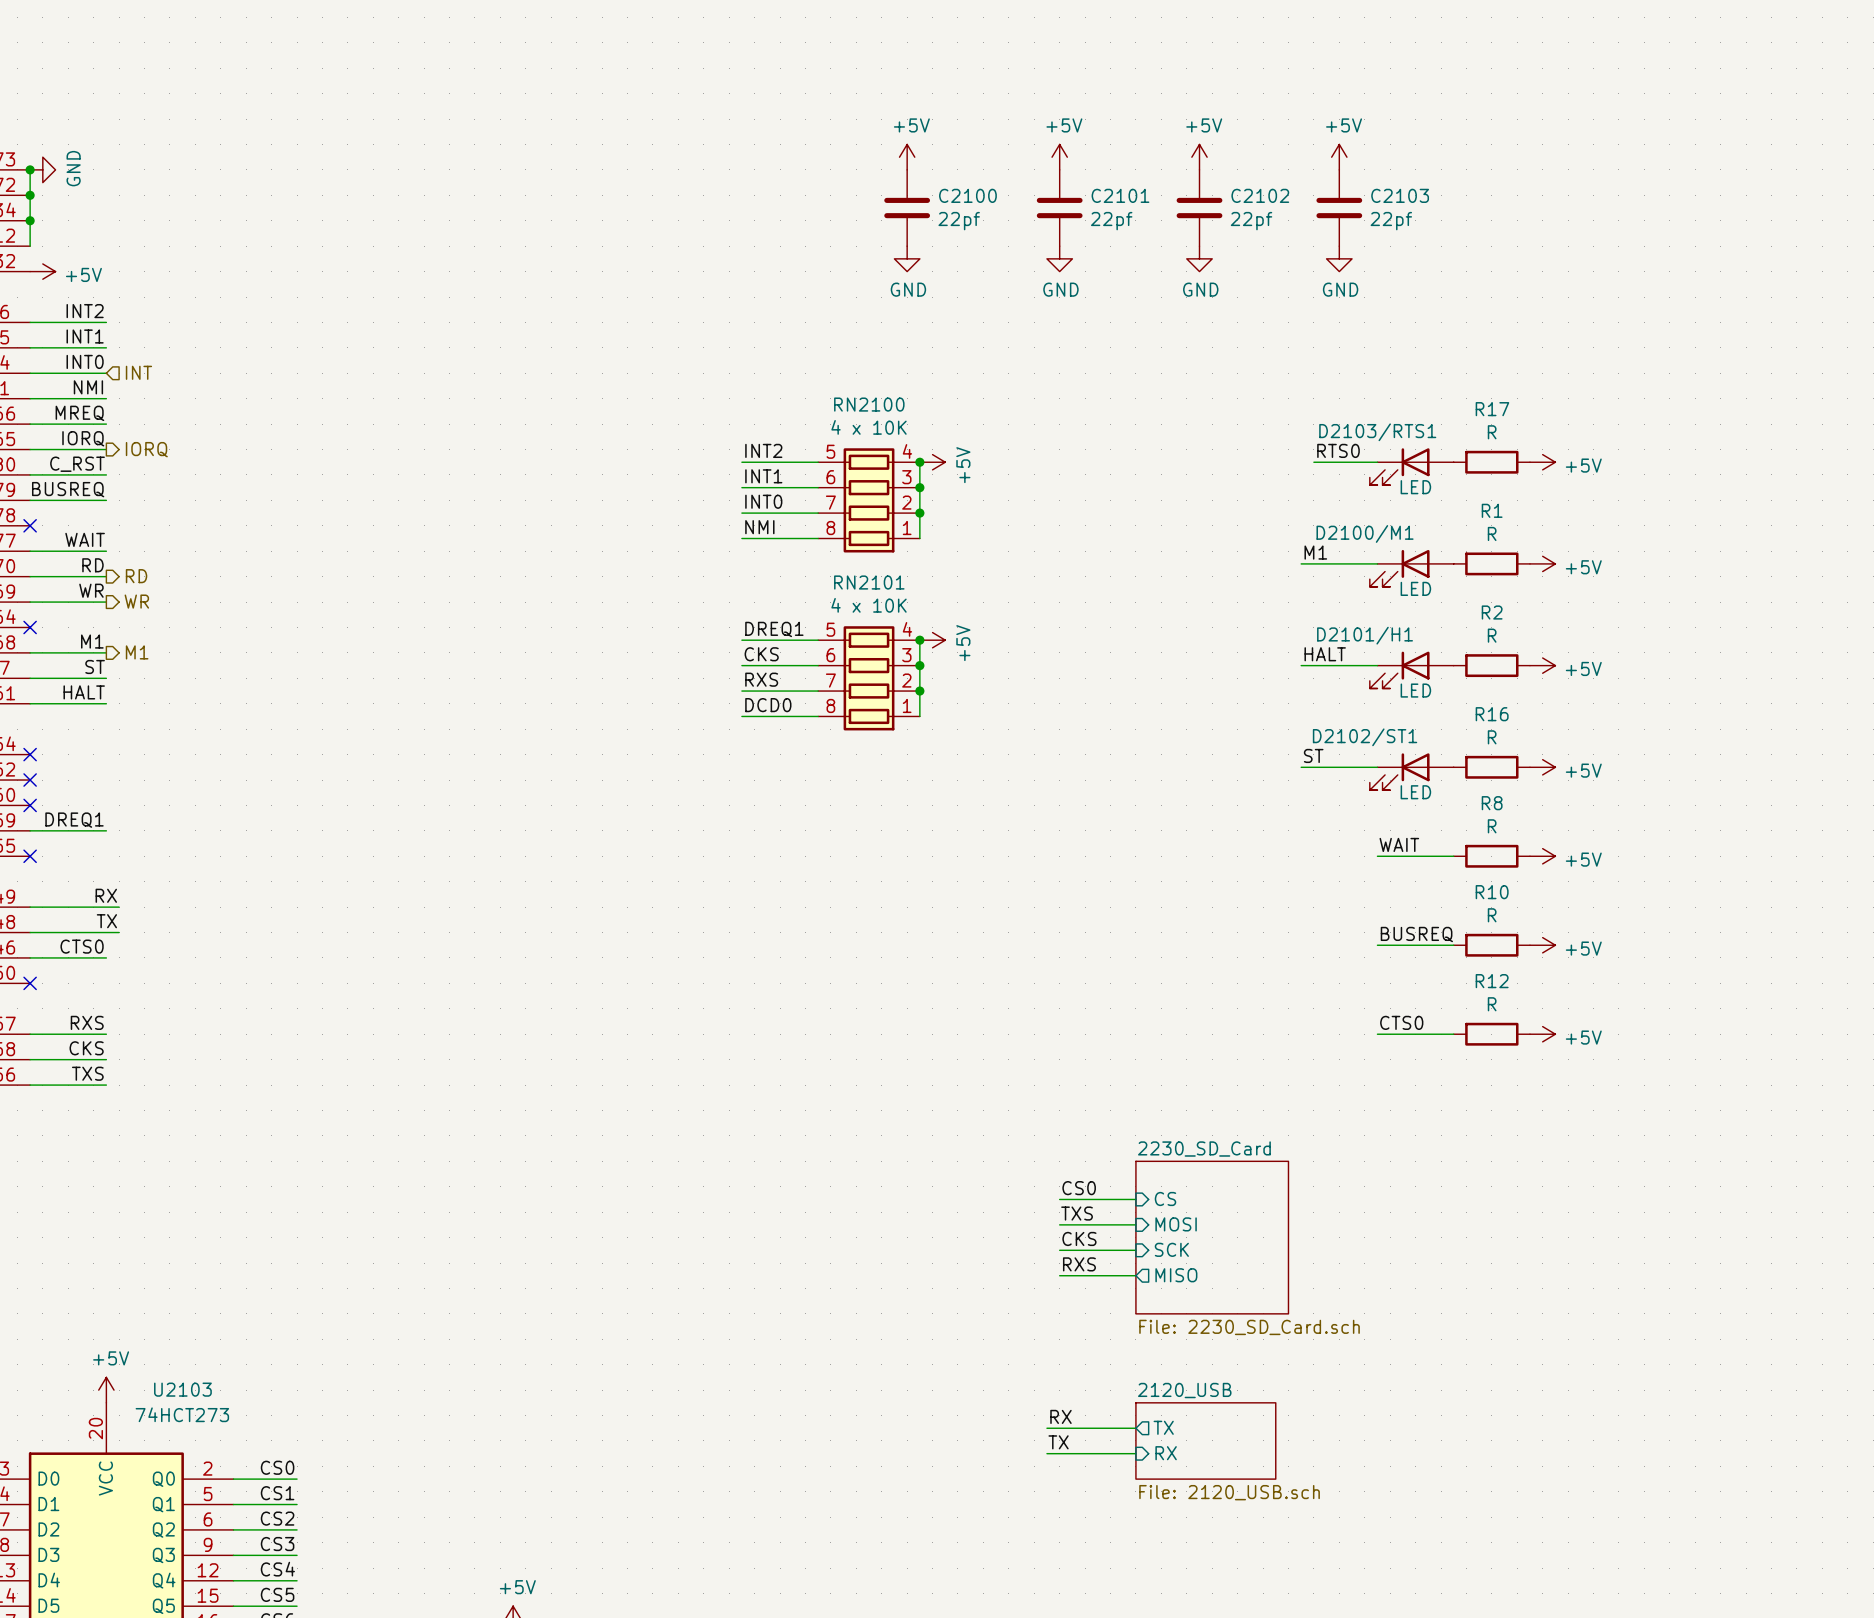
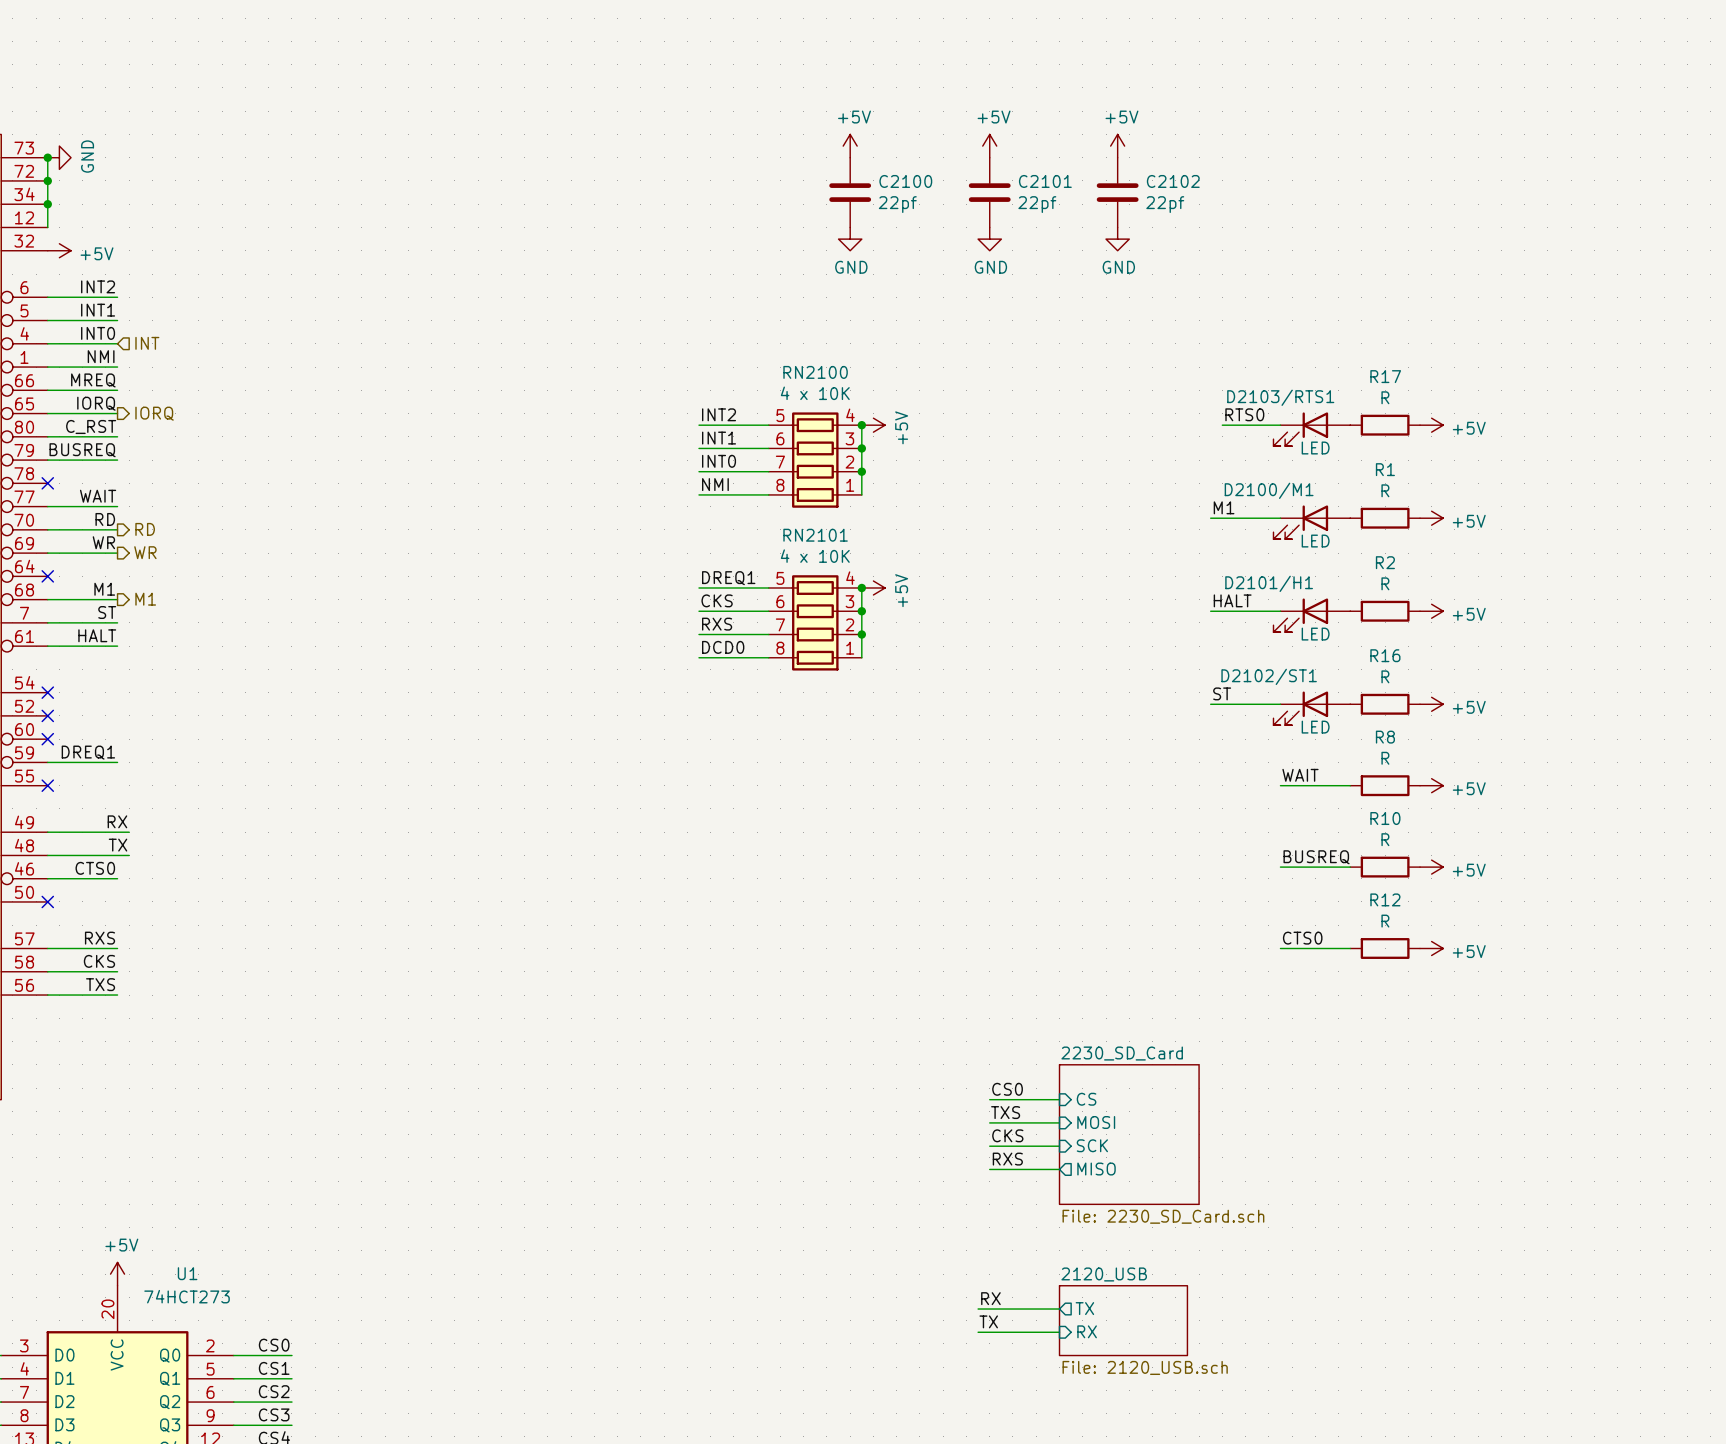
power symbol: +5V (1339, 157) -> none
C2103: 22pf (1339, 208) -> none
power symbol: GND (1339, 258) -> none
U2103 name: U2103 (182, 1389) -> U1 (187, 1273)

